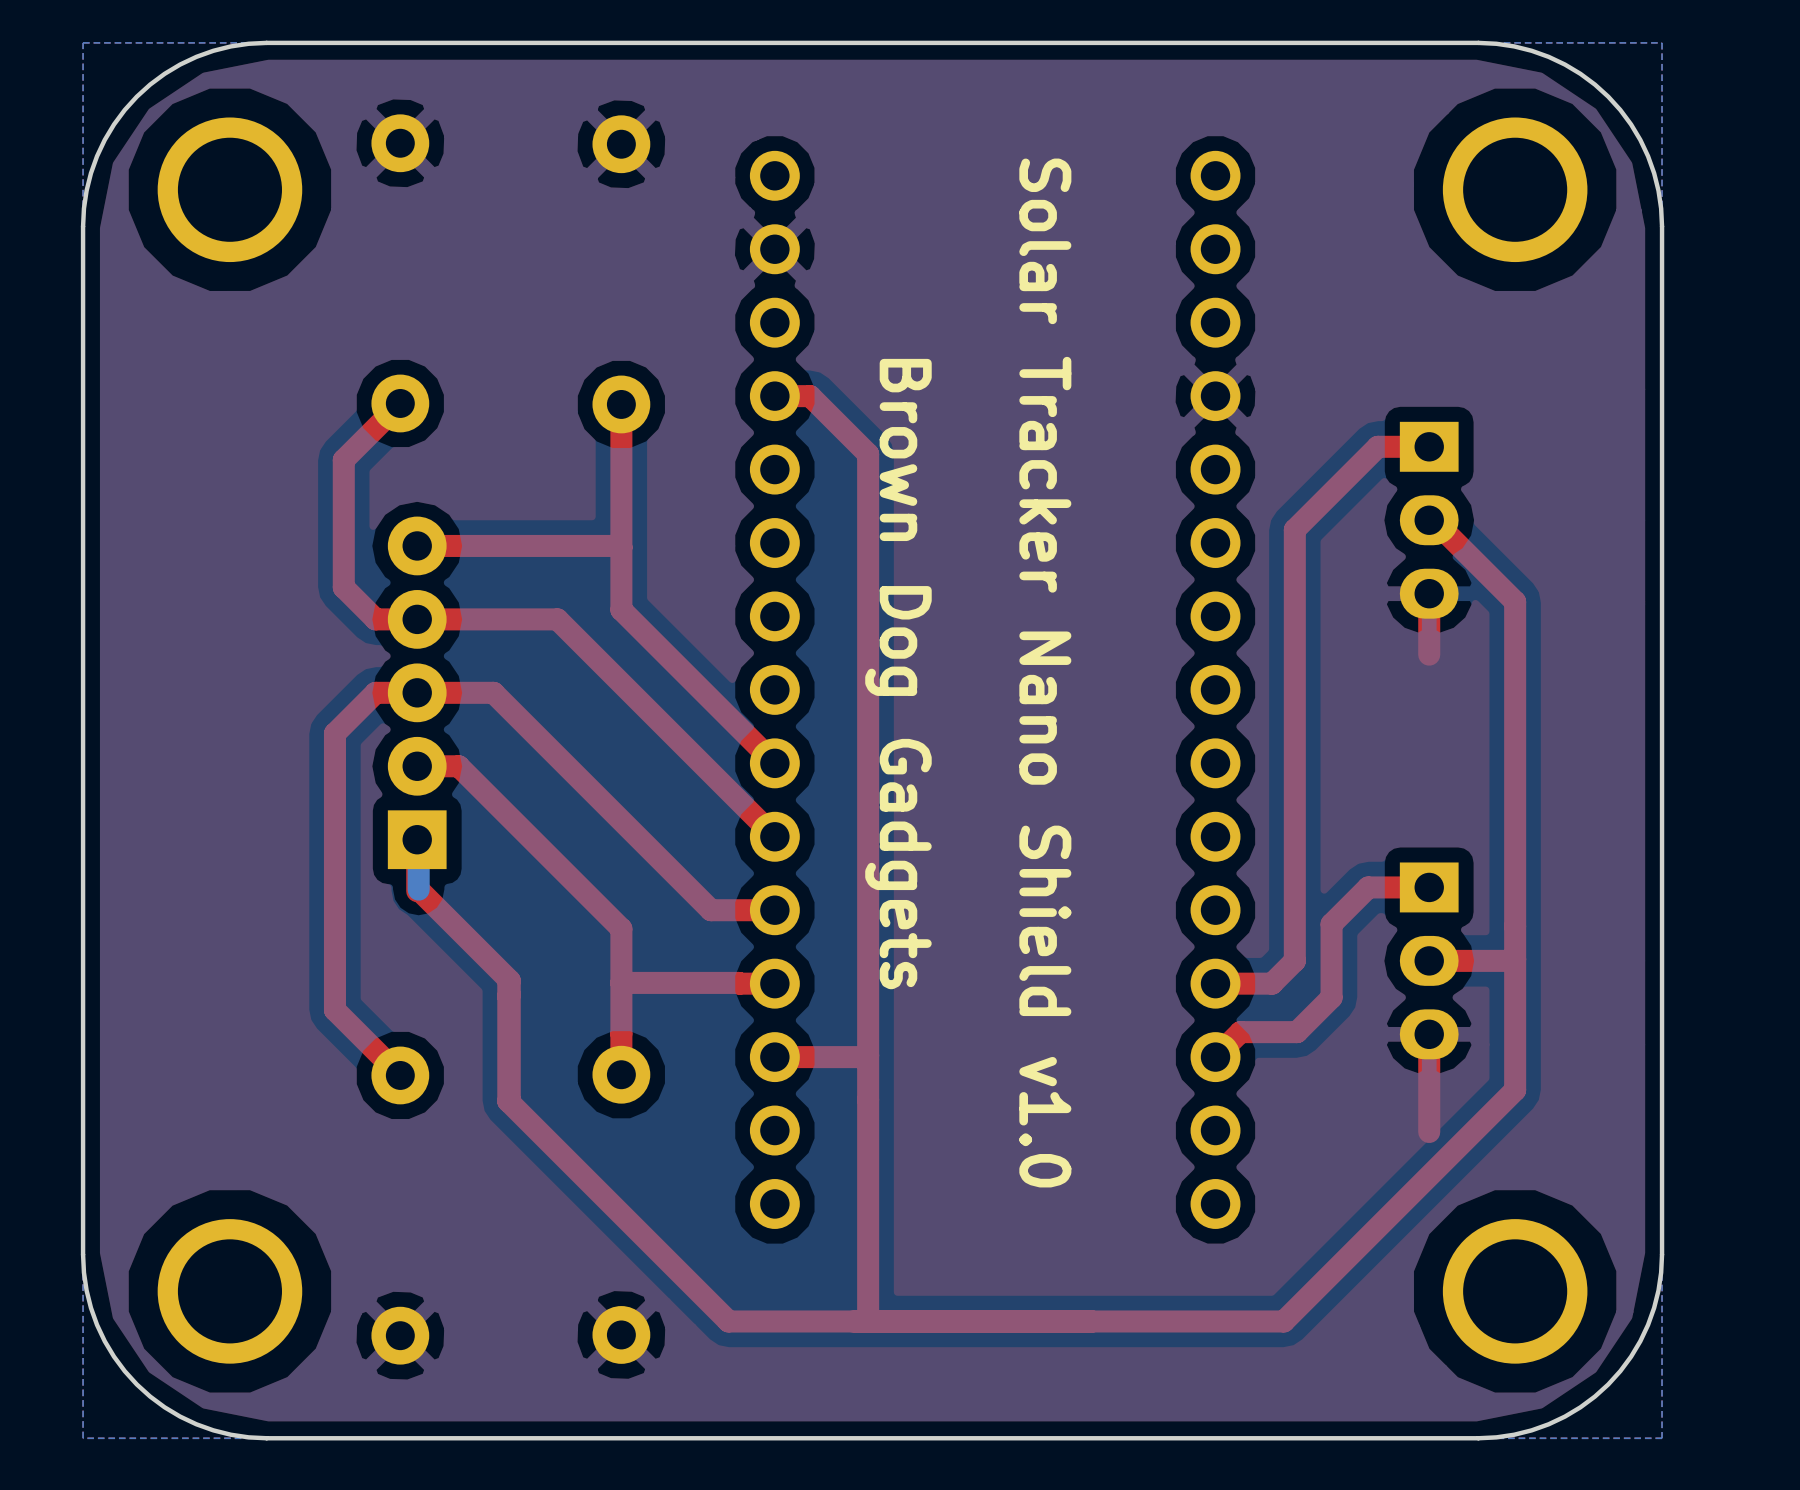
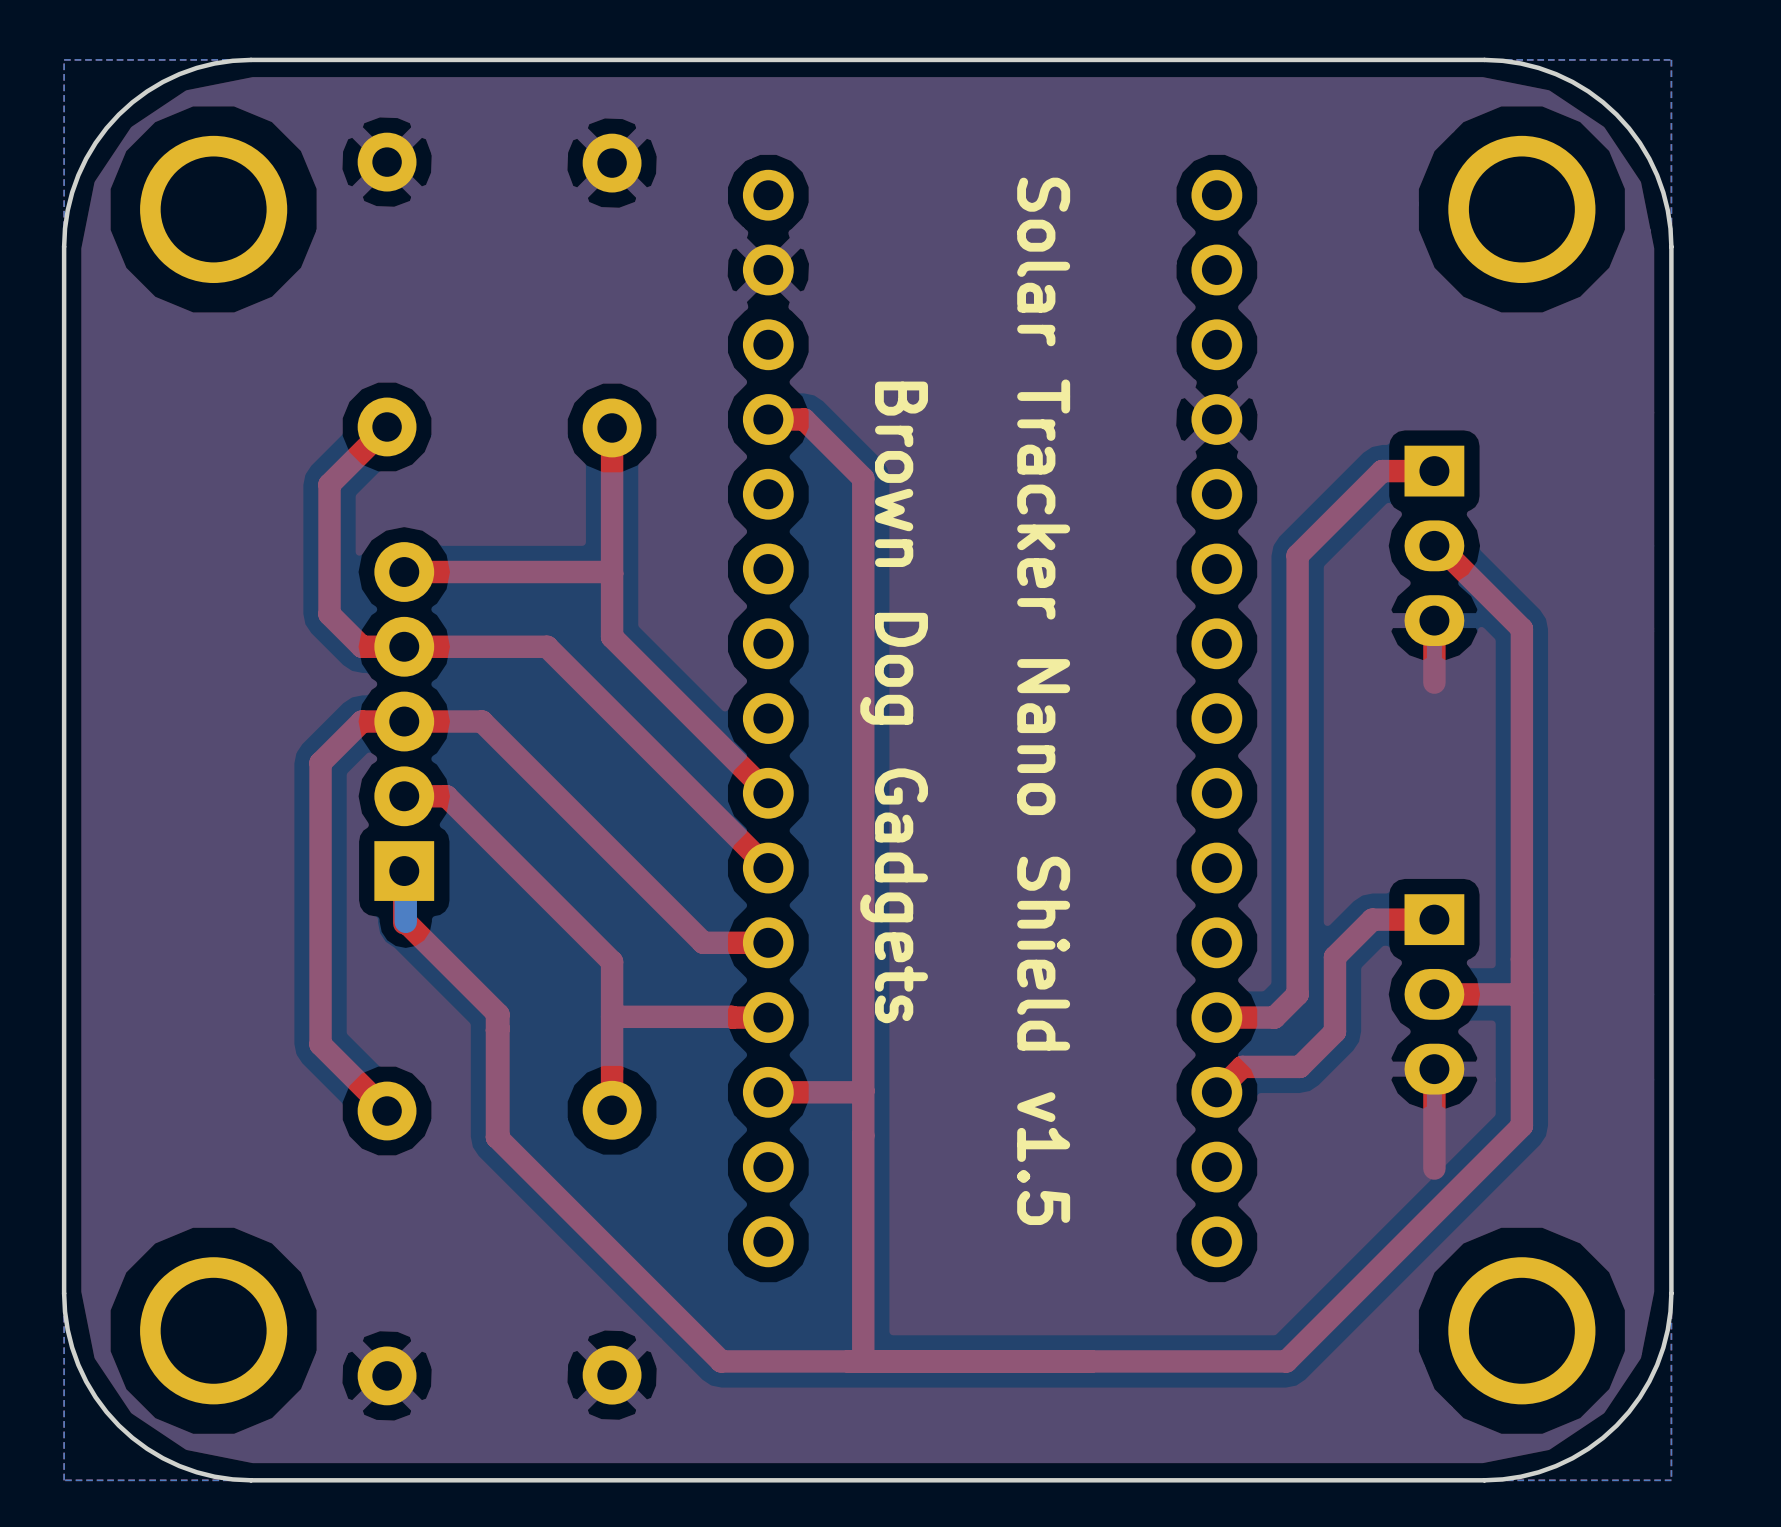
text: Solar Tracker Nano Shield v1.0 (1045, 673) -> Solar Tracker Nano Shield v1.5 (1043, 701)

